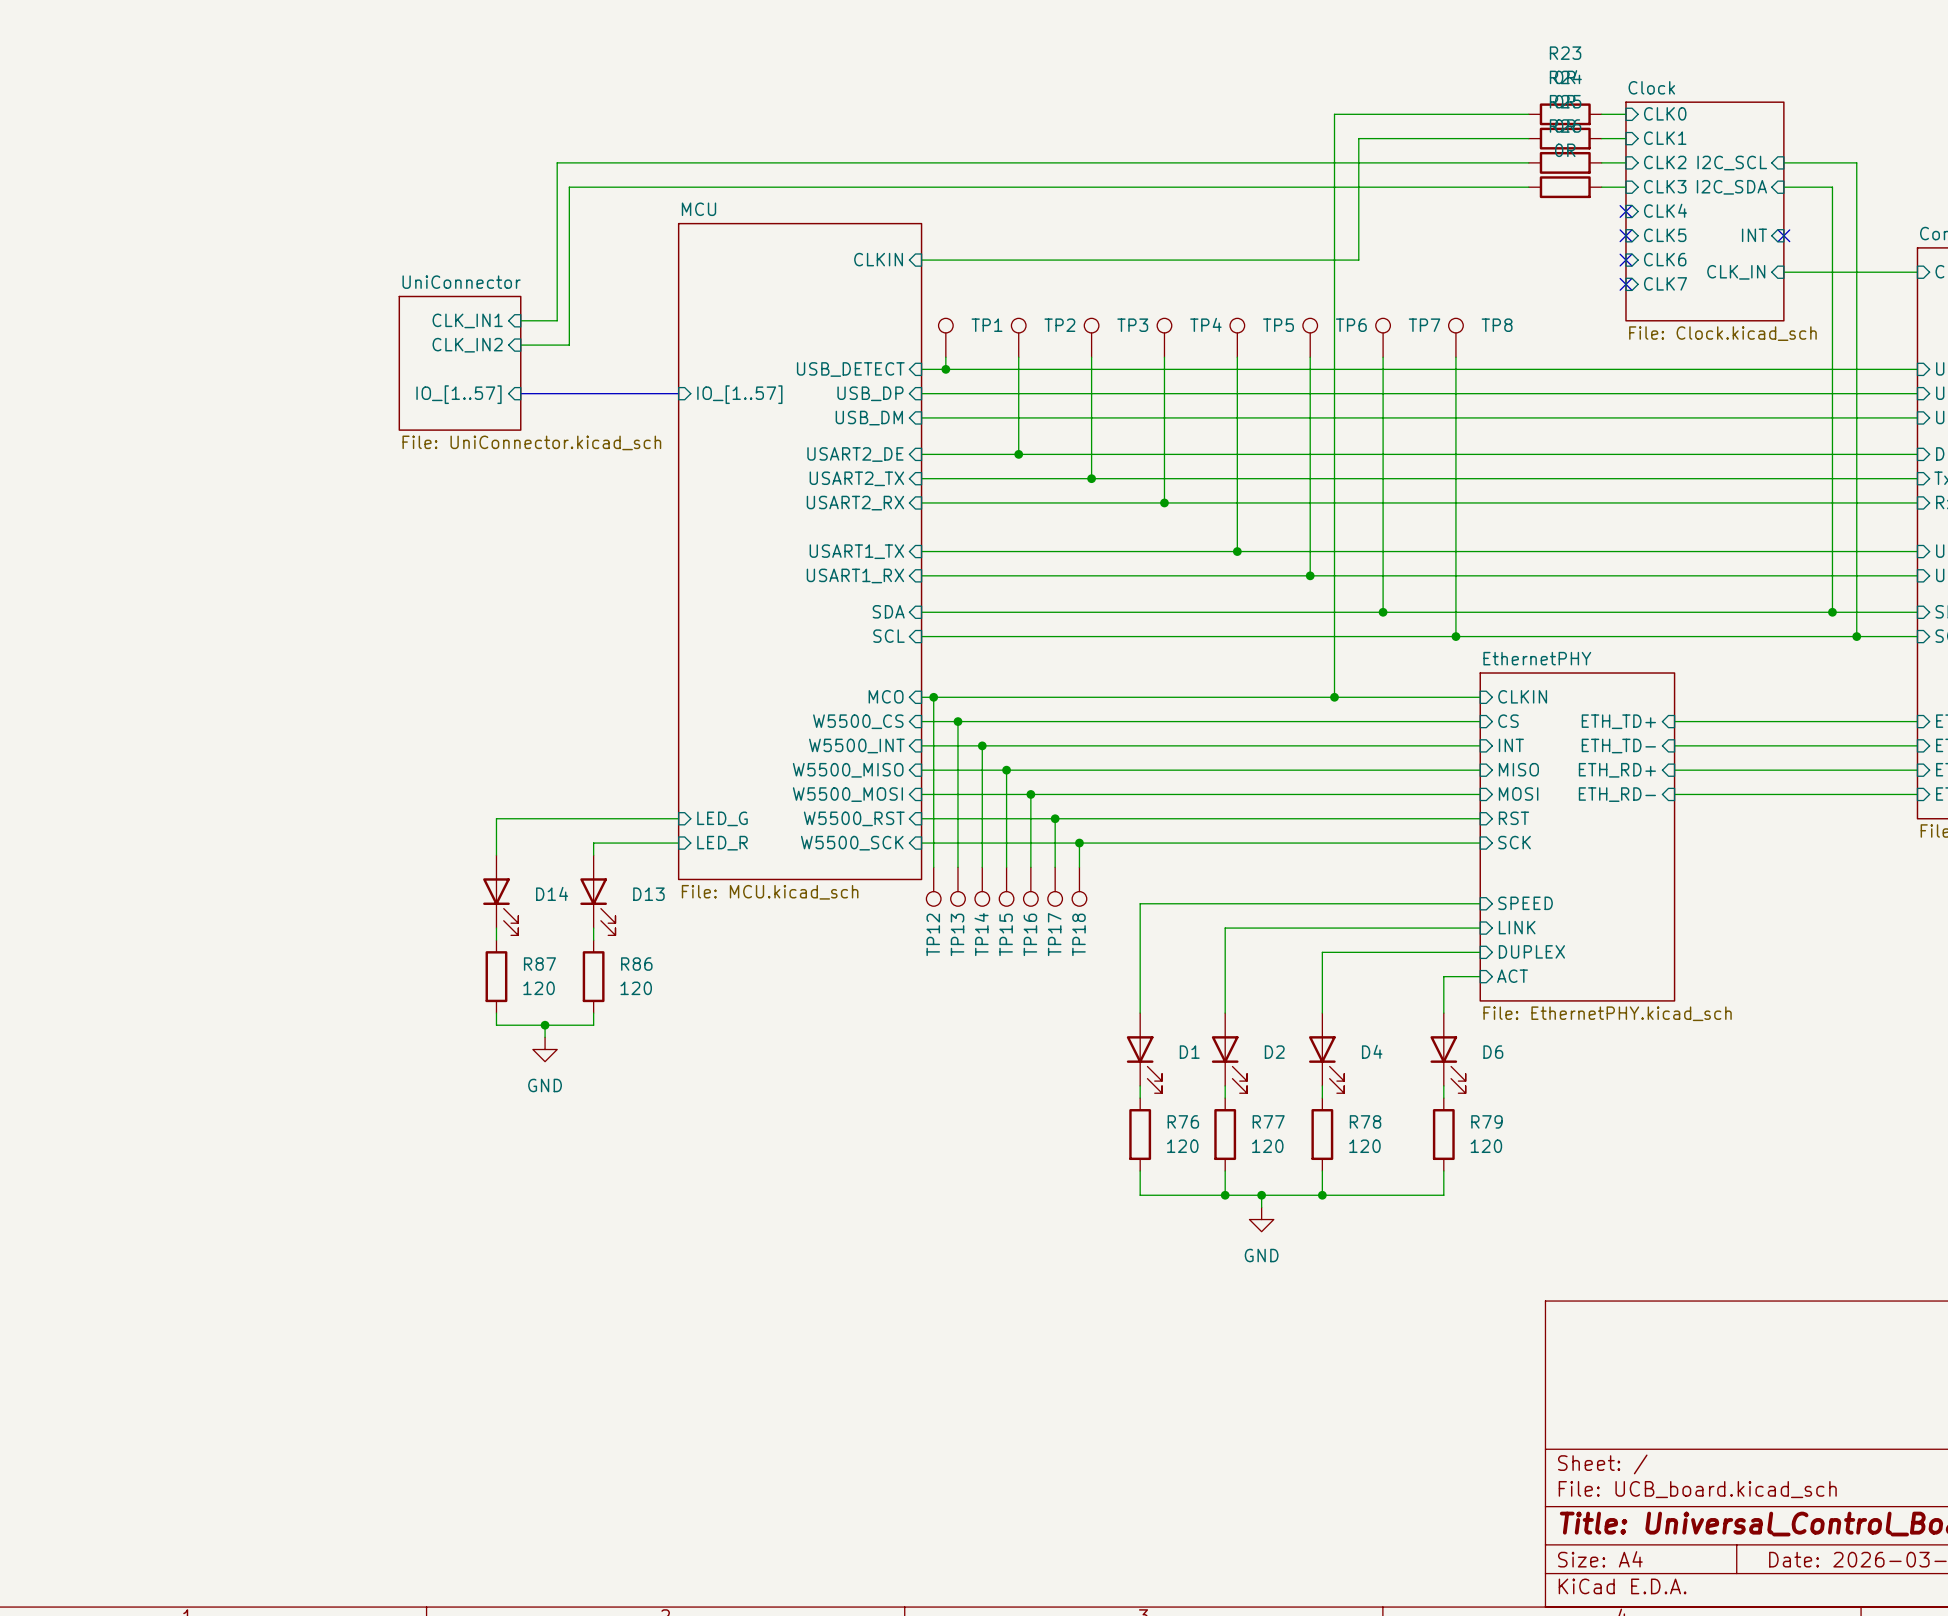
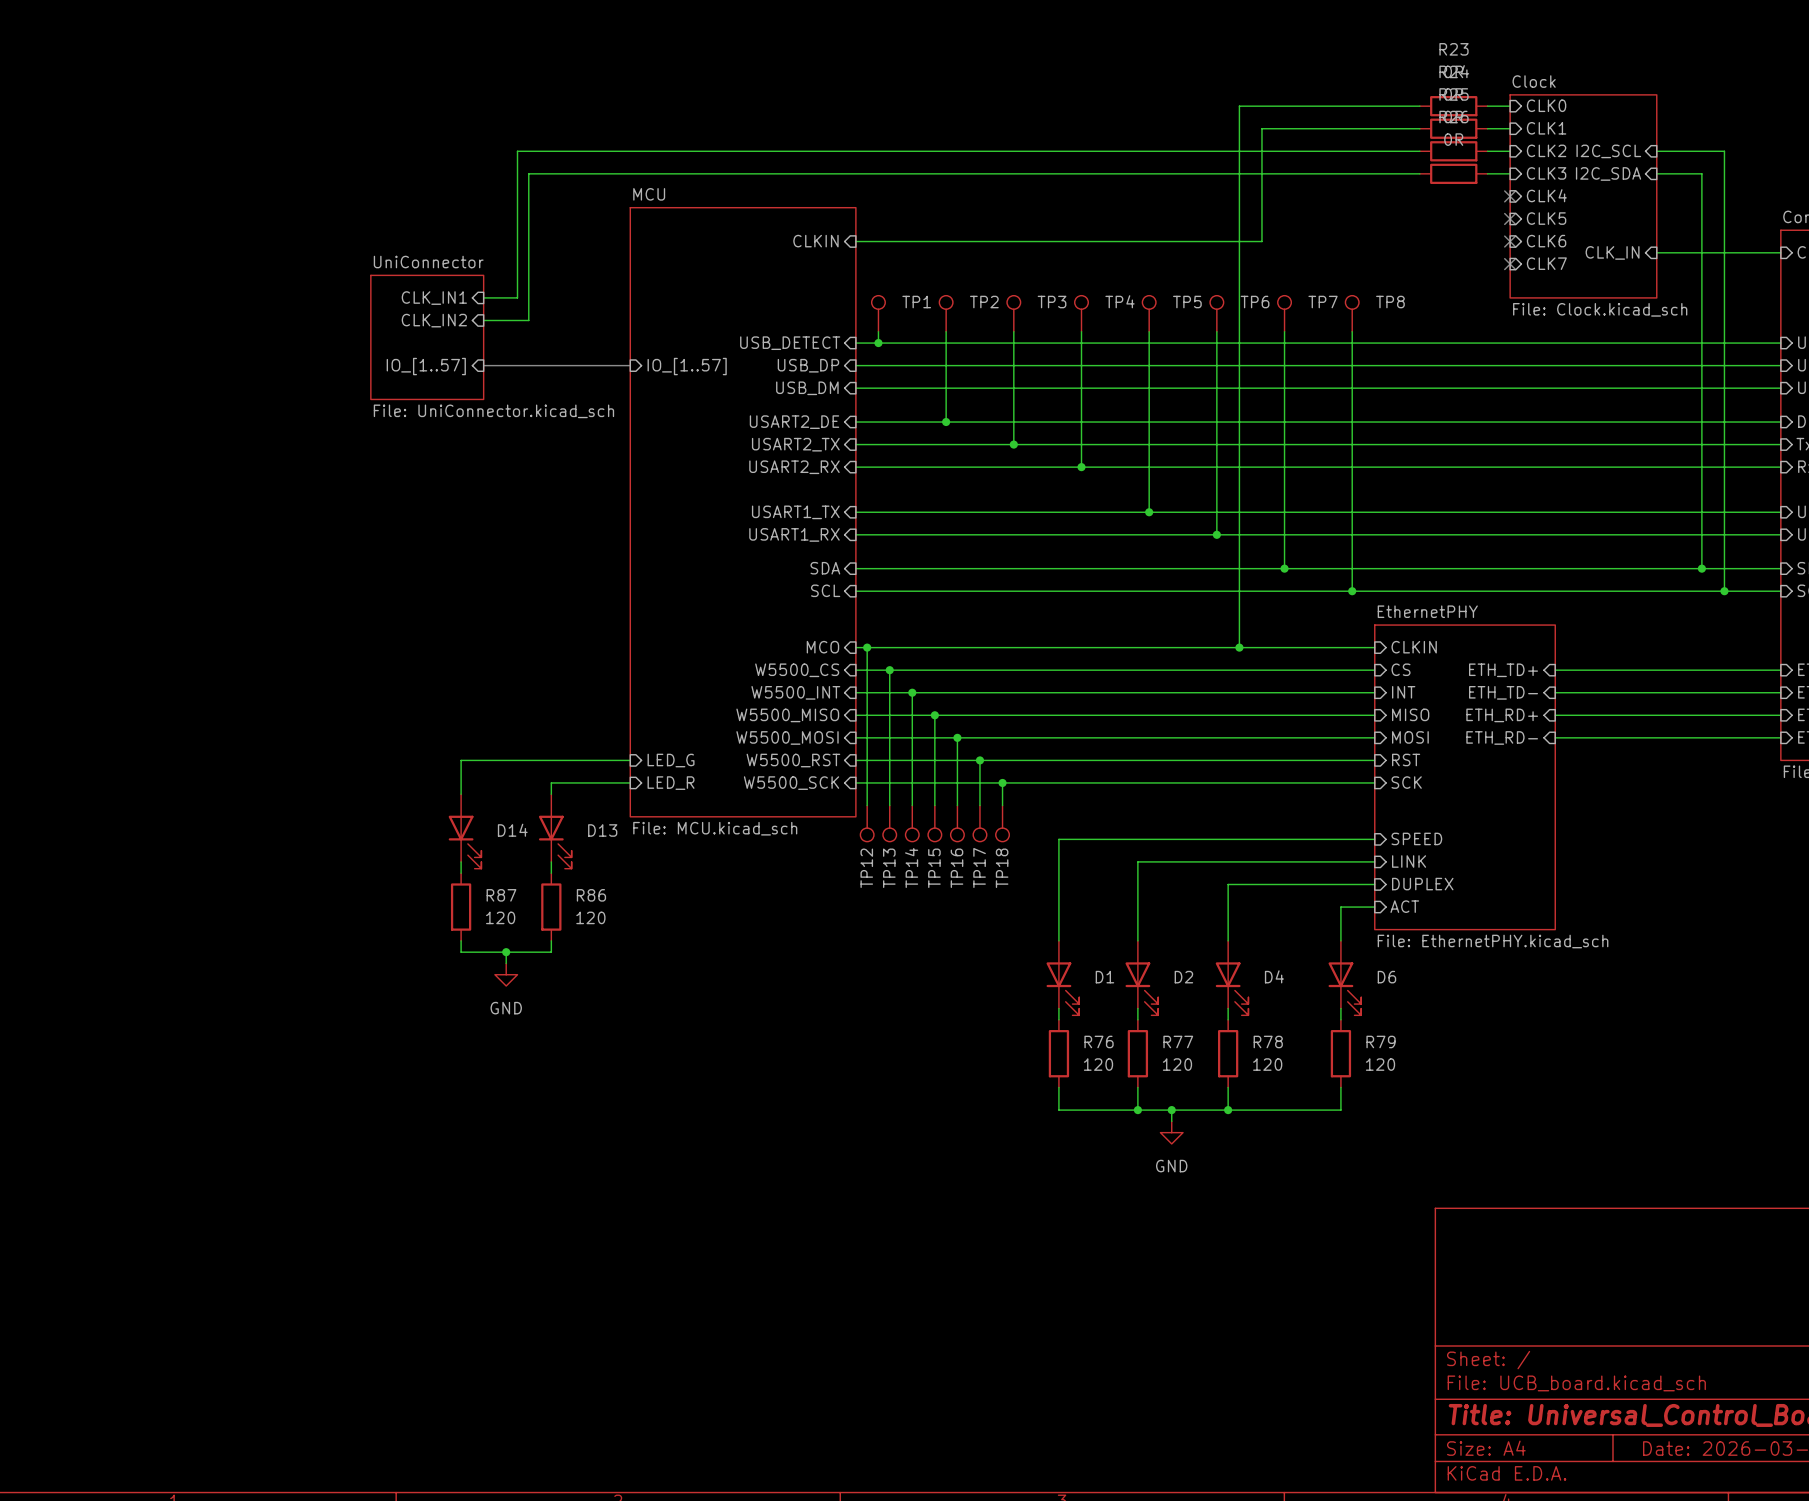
sheet pin: INT (1754, 235) -> none
no-connect mark: (1783, 235) -> none

